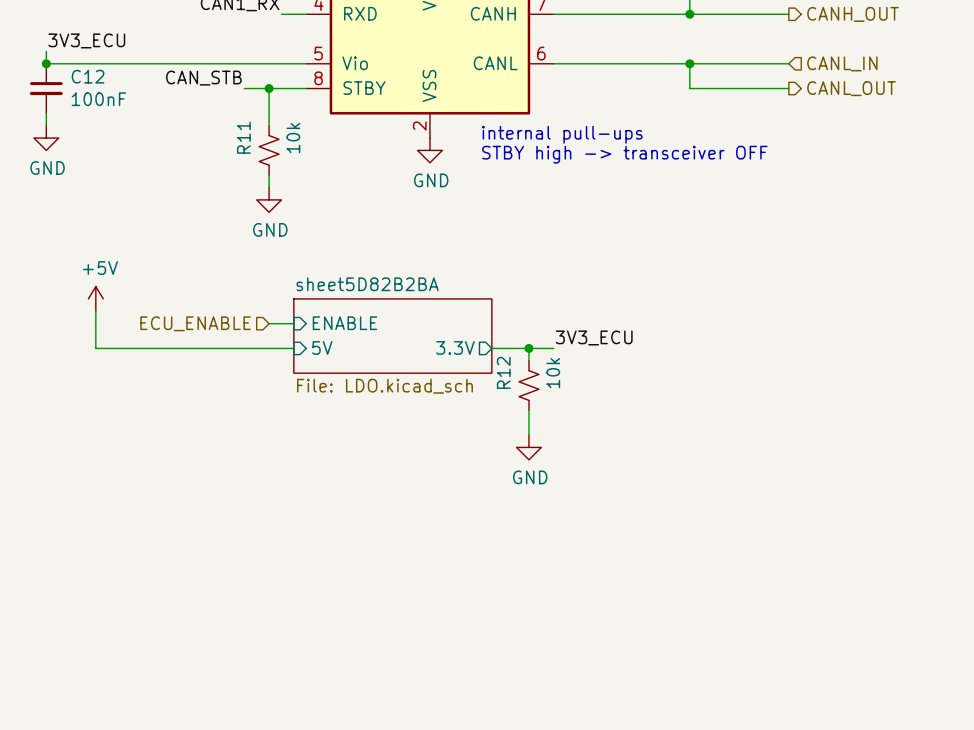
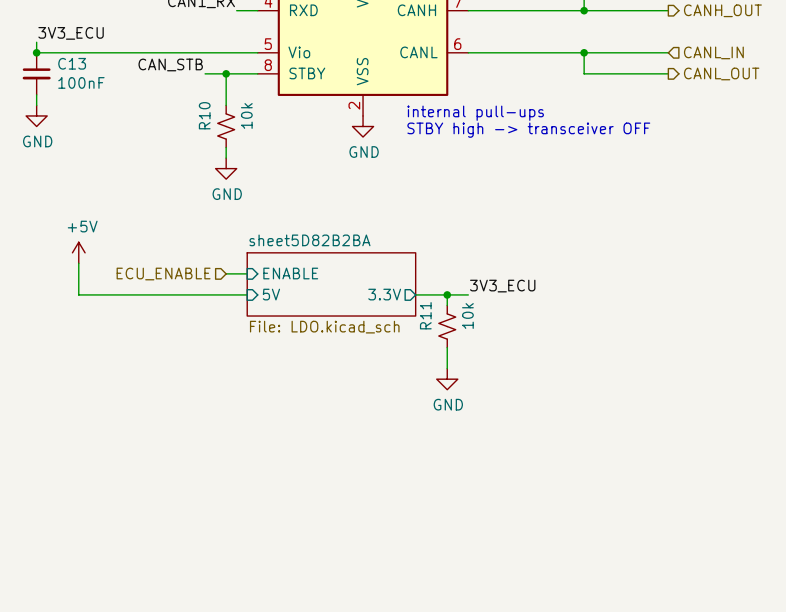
C12 name: C12 (88, 76) -> C13 (72, 63)
R11 name: R11 (243, 137) -> R10 (204, 115)
R12 name: R12 (503, 372) -> R11 (425, 315)

